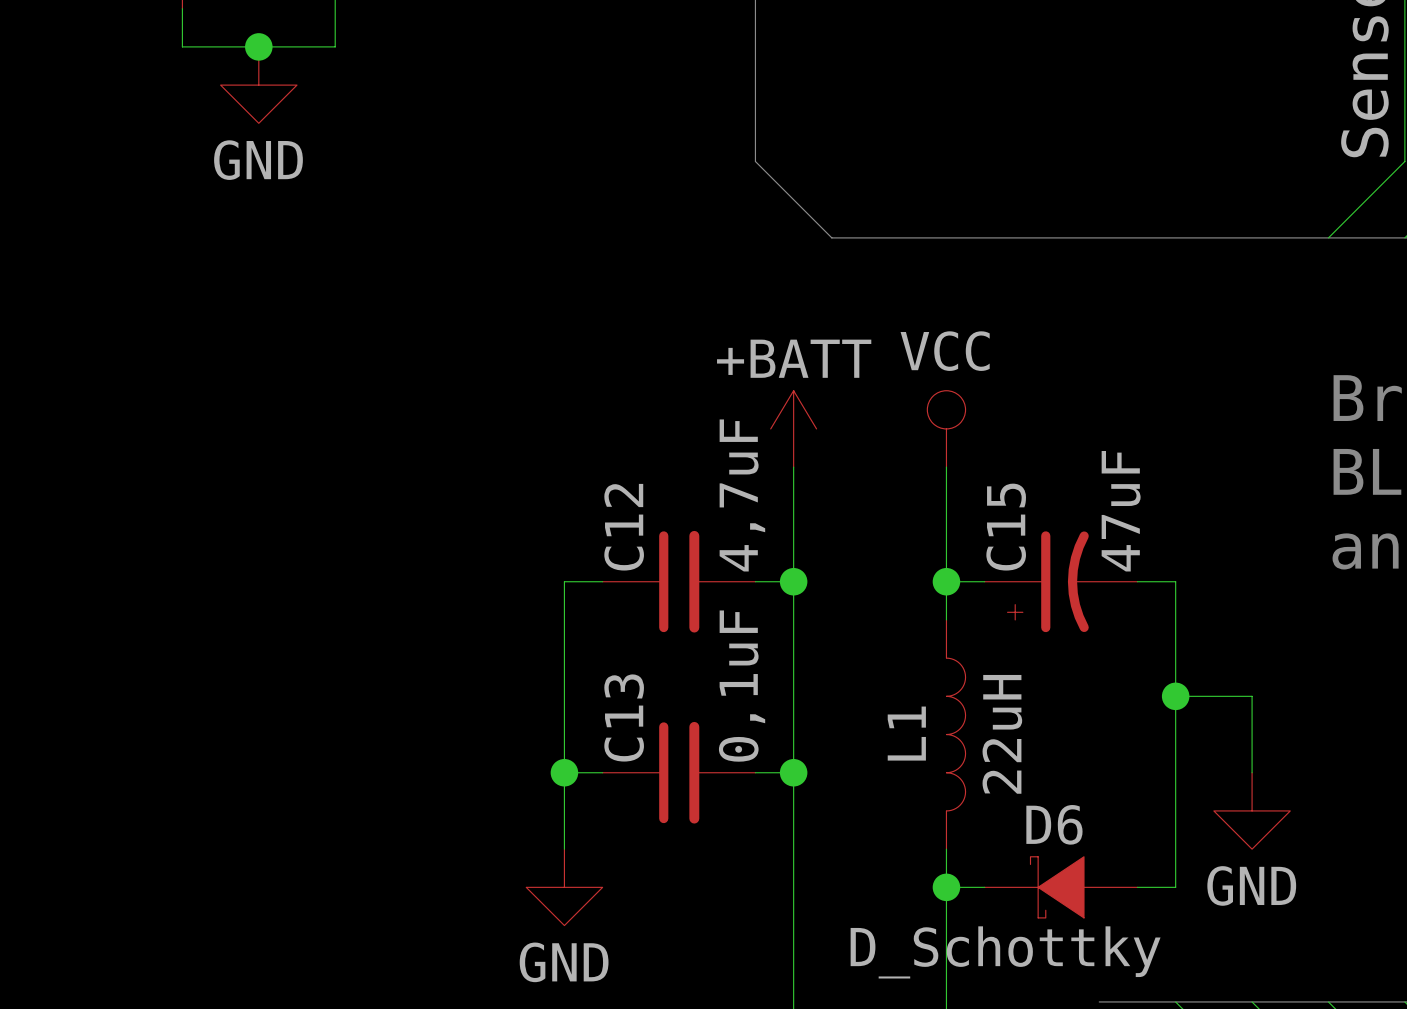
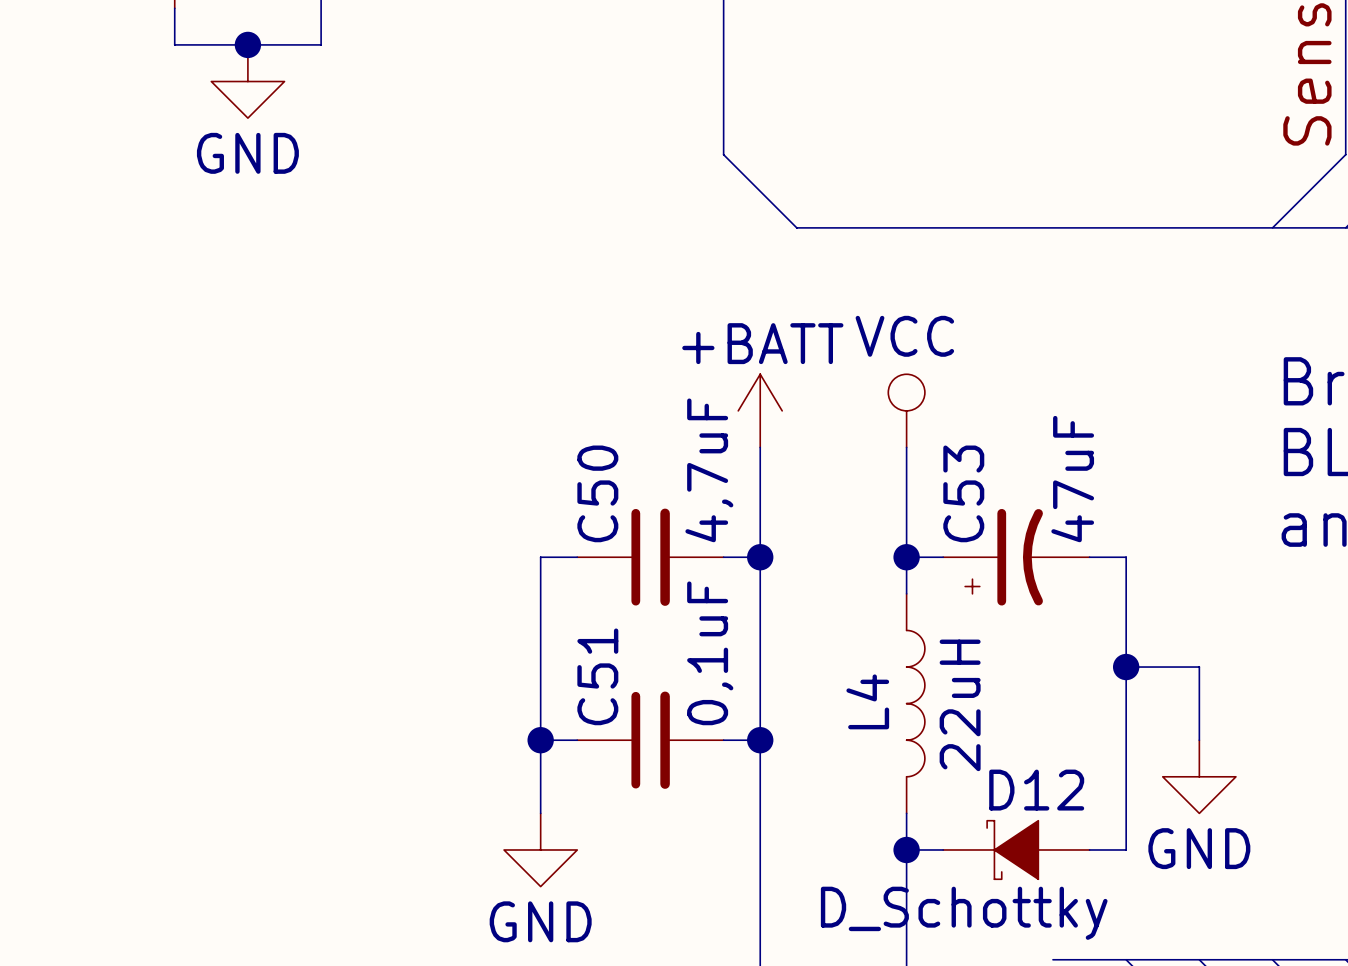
C12 name: C12 (624, 527) -> C50 (597, 493)
C15 name: C15 (1006, 527) -> C53 (963, 493)
C13 name: C13 (624, 717) -> C51 (597, 676)
L1 name: L1 (906, 733) -> L4 (867, 701)
D6 name: D6 (1054, 824) -> D12 (1036, 790)

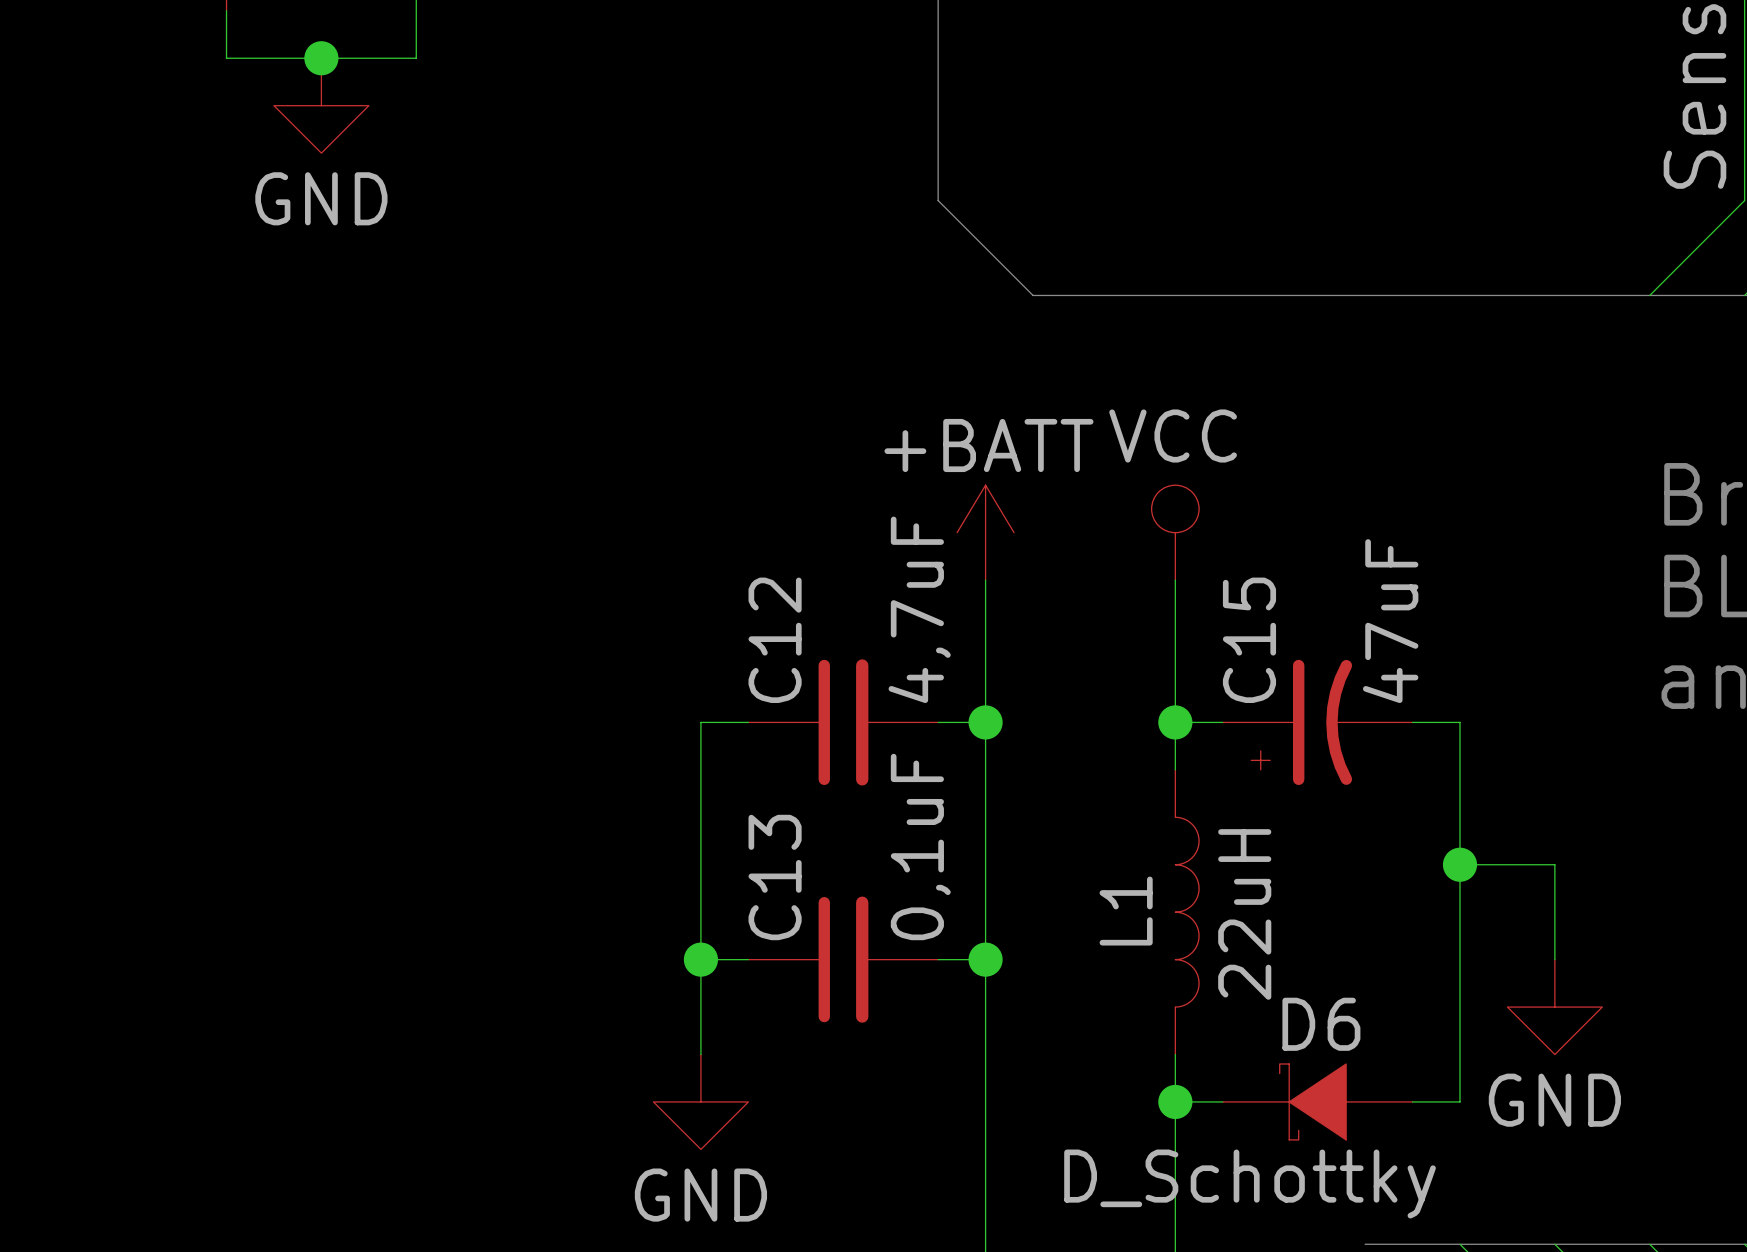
C50 name: C50 (597, 493) -> C12 (775, 640)
C53 name: C53 (963, 493) -> C15 (1249, 640)
C51 name: C51 (597, 676) -> C13 (775, 877)
L4 name: L4 (867, 701) -> L1 (1126, 911)
D12 name: D12 (1036, 790) -> D6 (1321, 1024)

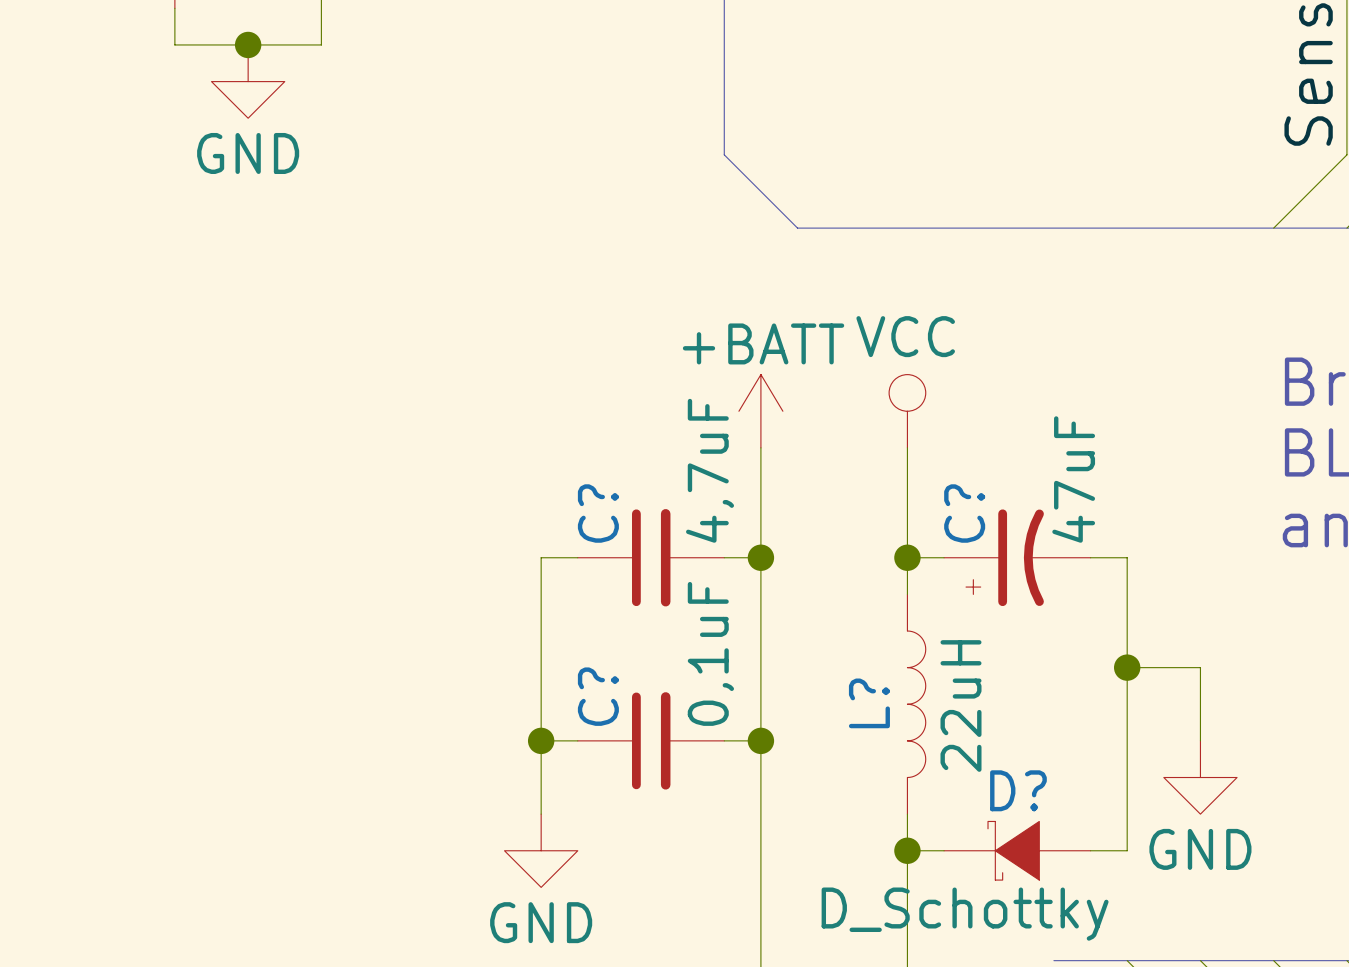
C12 name: C12 (775, 640) -> C? (598, 513)
C15 name: C15 (1249, 640) -> C? (964, 513)
C13 name: C13 (775, 877) -> C? (598, 696)
L1 name: L1 (1126, 911) -> L? (869, 703)
D6 name: D6 (1321, 1024) -> D? (1018, 790)

